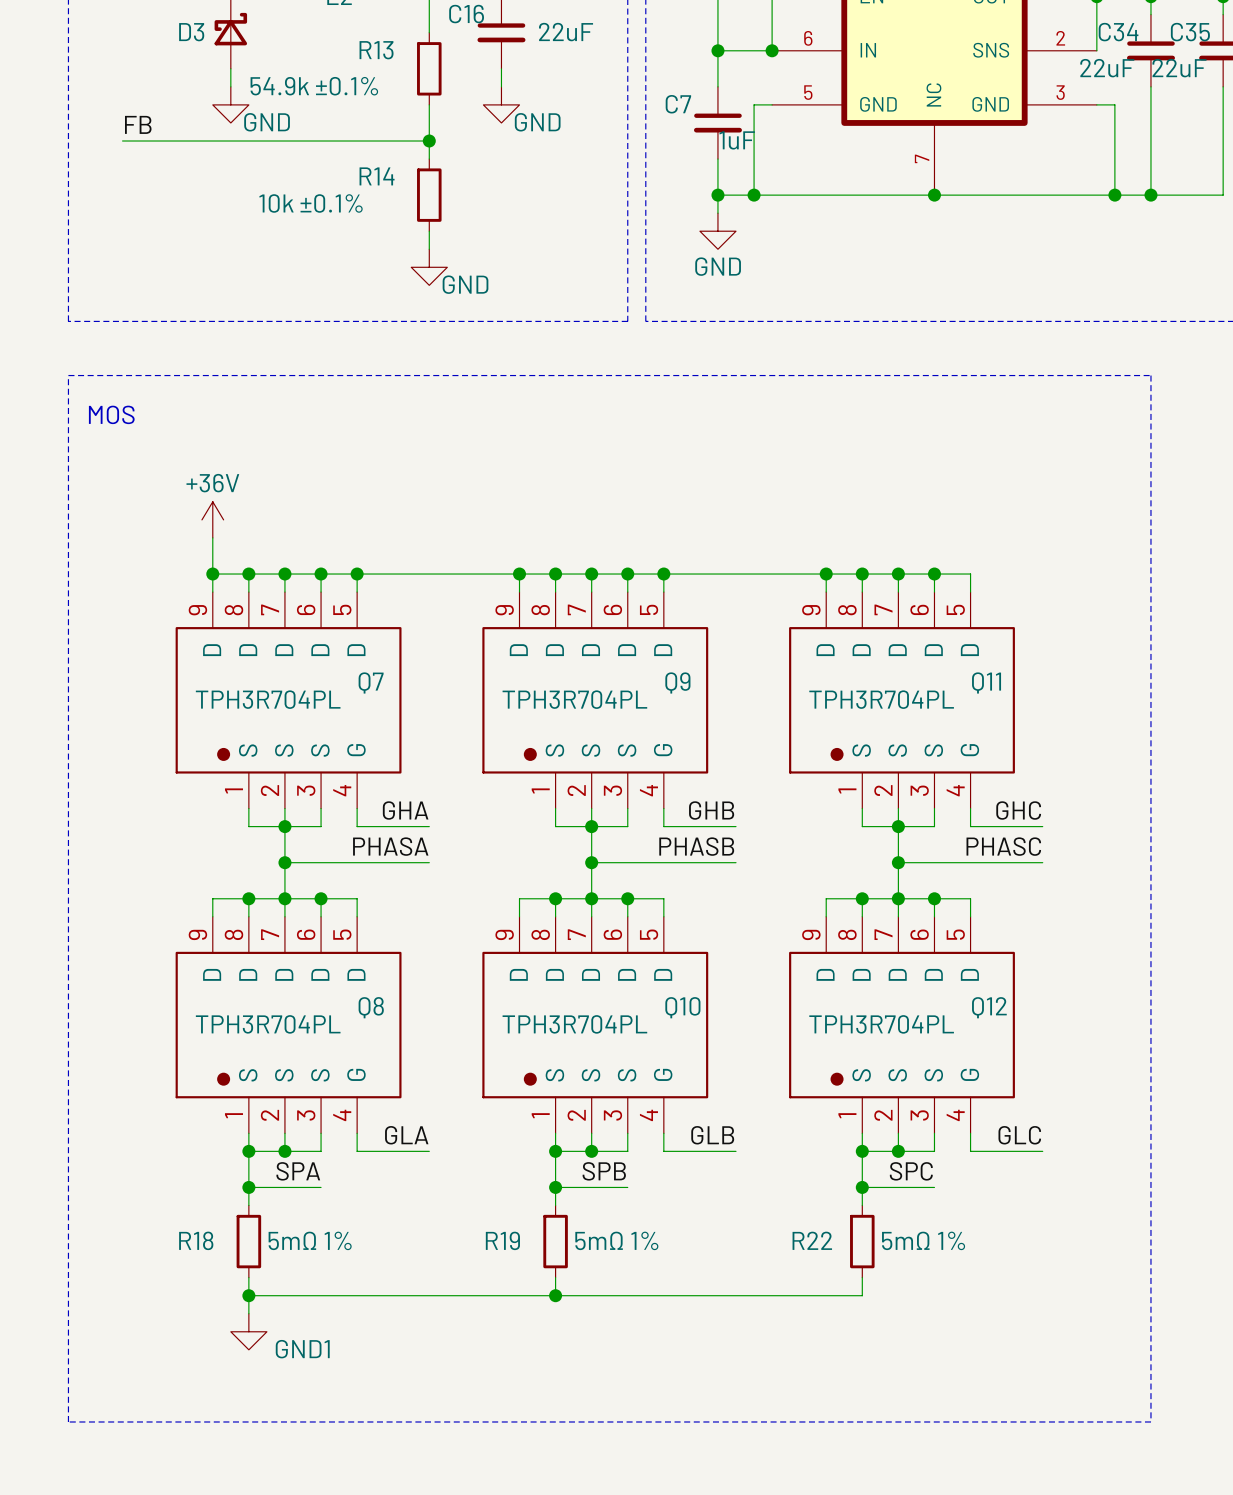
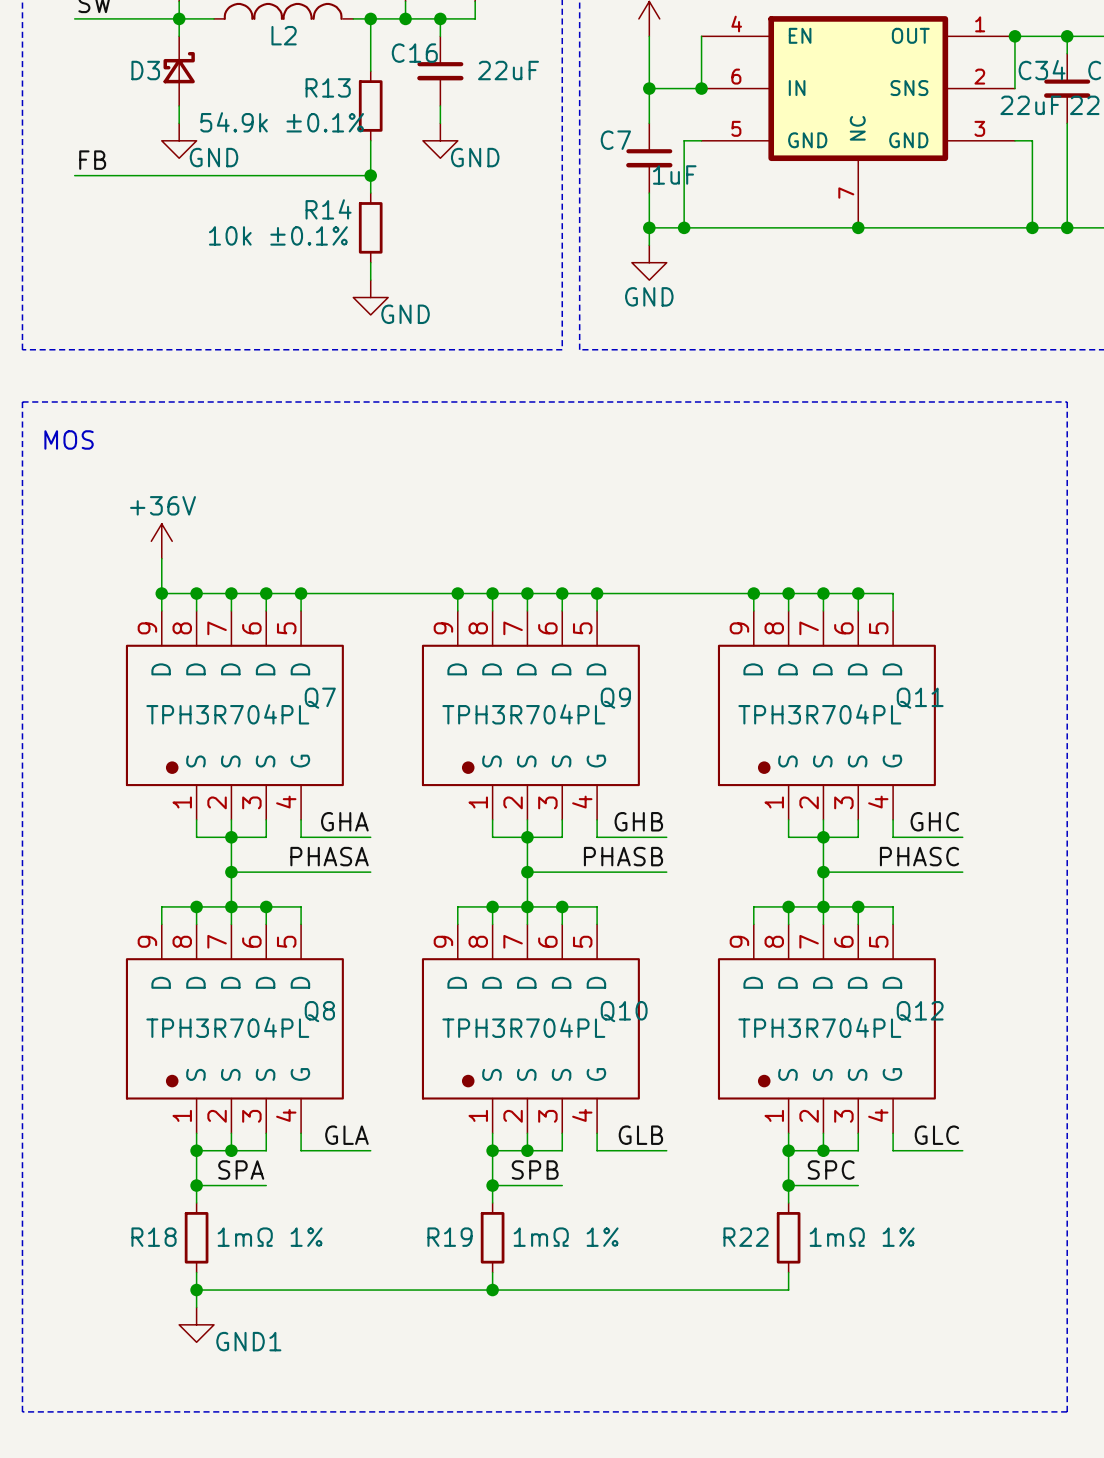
R18 value: 5mΩ 1% (310, 1240) -> 1mΩ 1% (270, 1237)
R19 value: 5mΩ 1% (616, 1240) -> 1mΩ 1% (566, 1237)
R22 value: 5mΩ 1% (923, 1240) -> 1mΩ 1% (862, 1237)

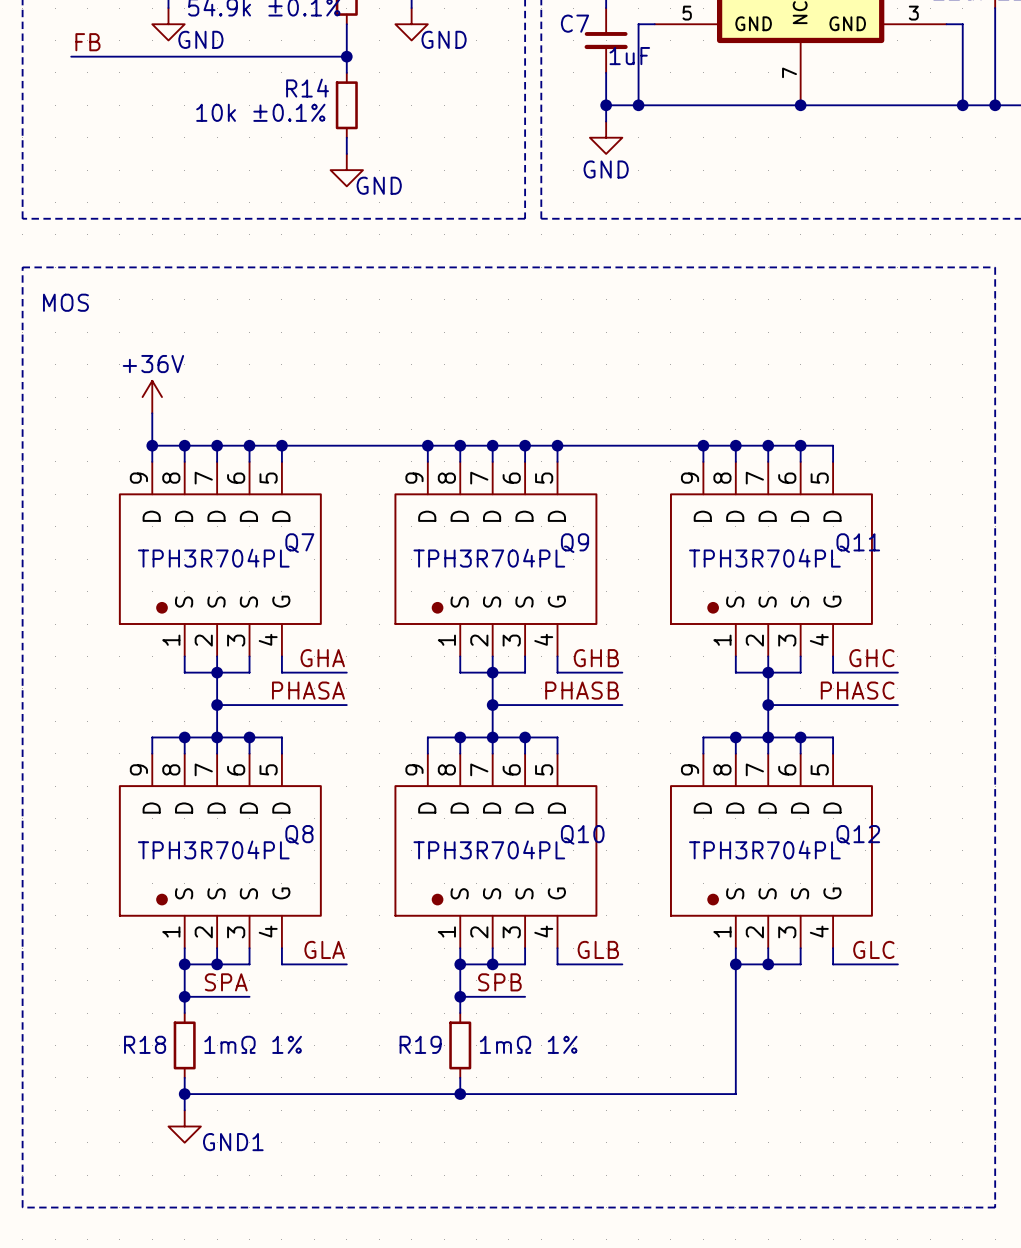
label: SPC (831, 1170) -> none
wire: (788, 1185) (858, 1185) -> none
junction: (788, 1185) -> none
wire: none -> (735, 1013) (735, 1077)
R22: 1mΩ 1% (788, 1237) -> none

